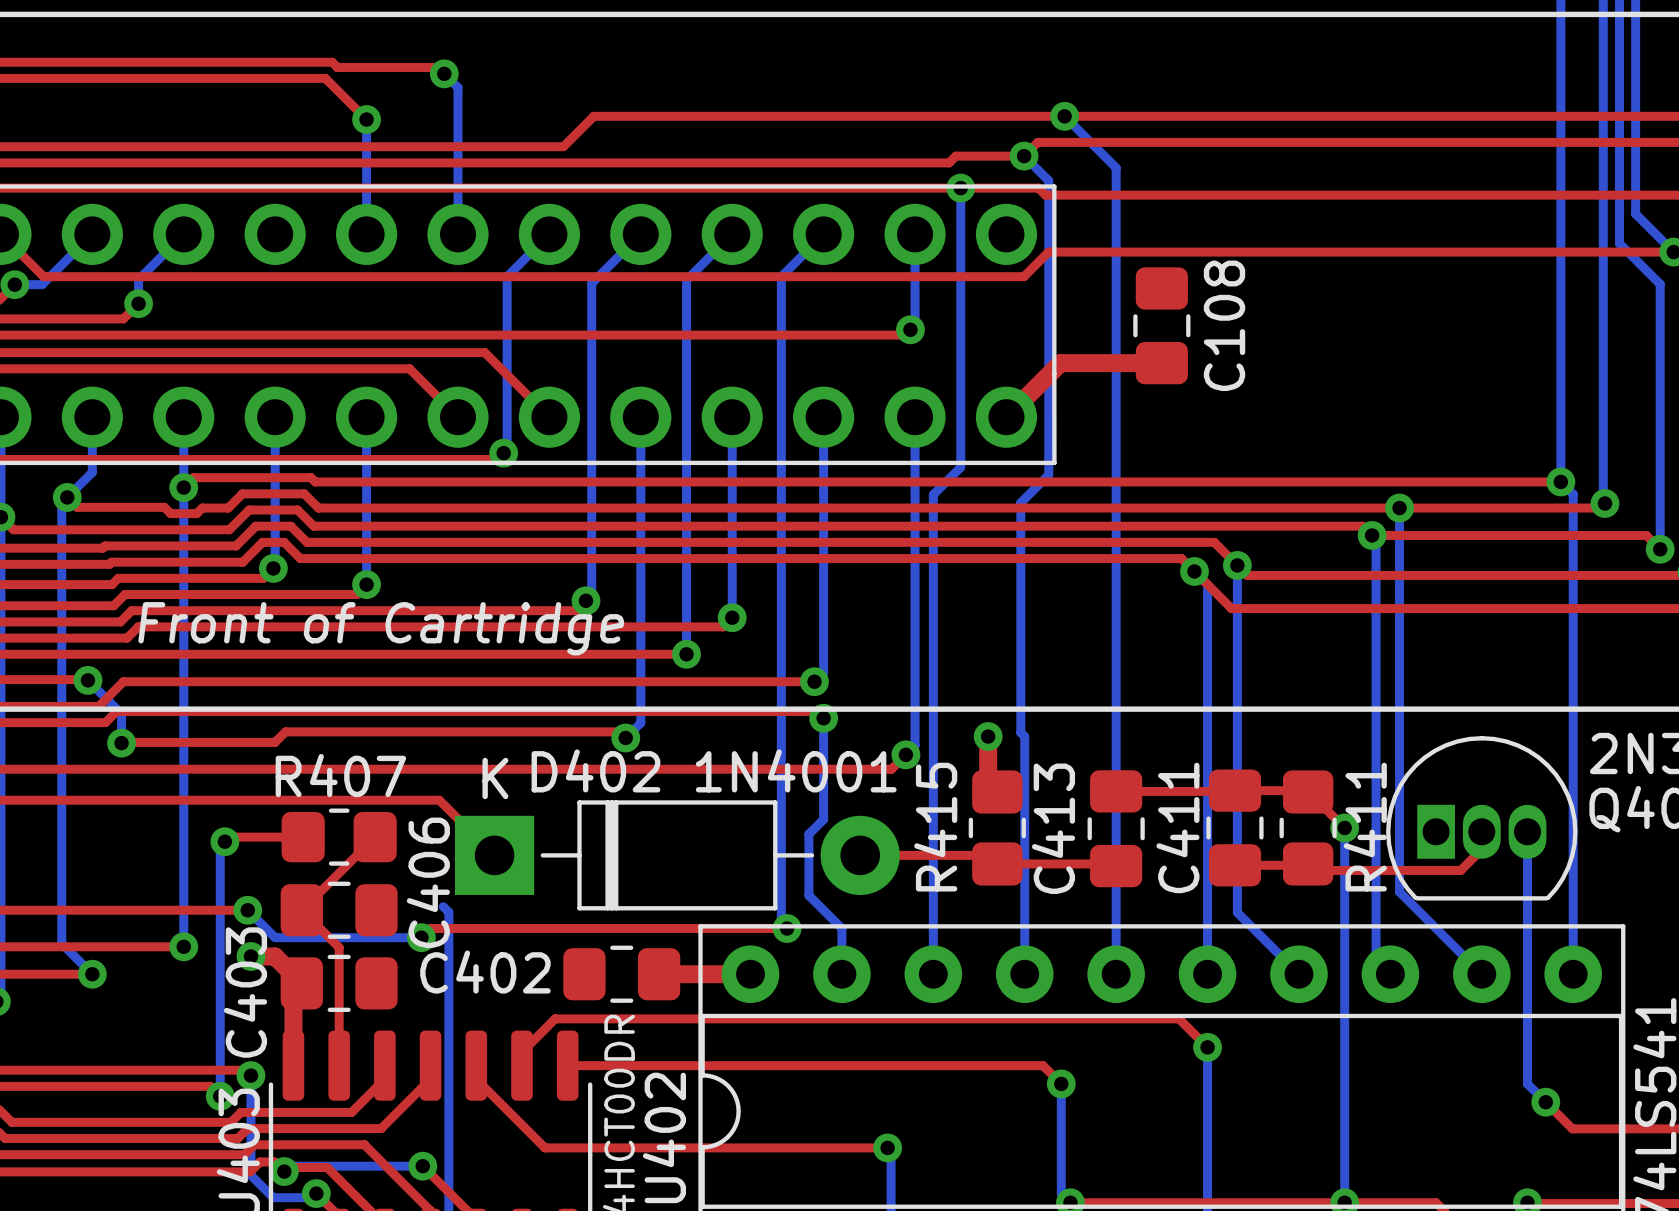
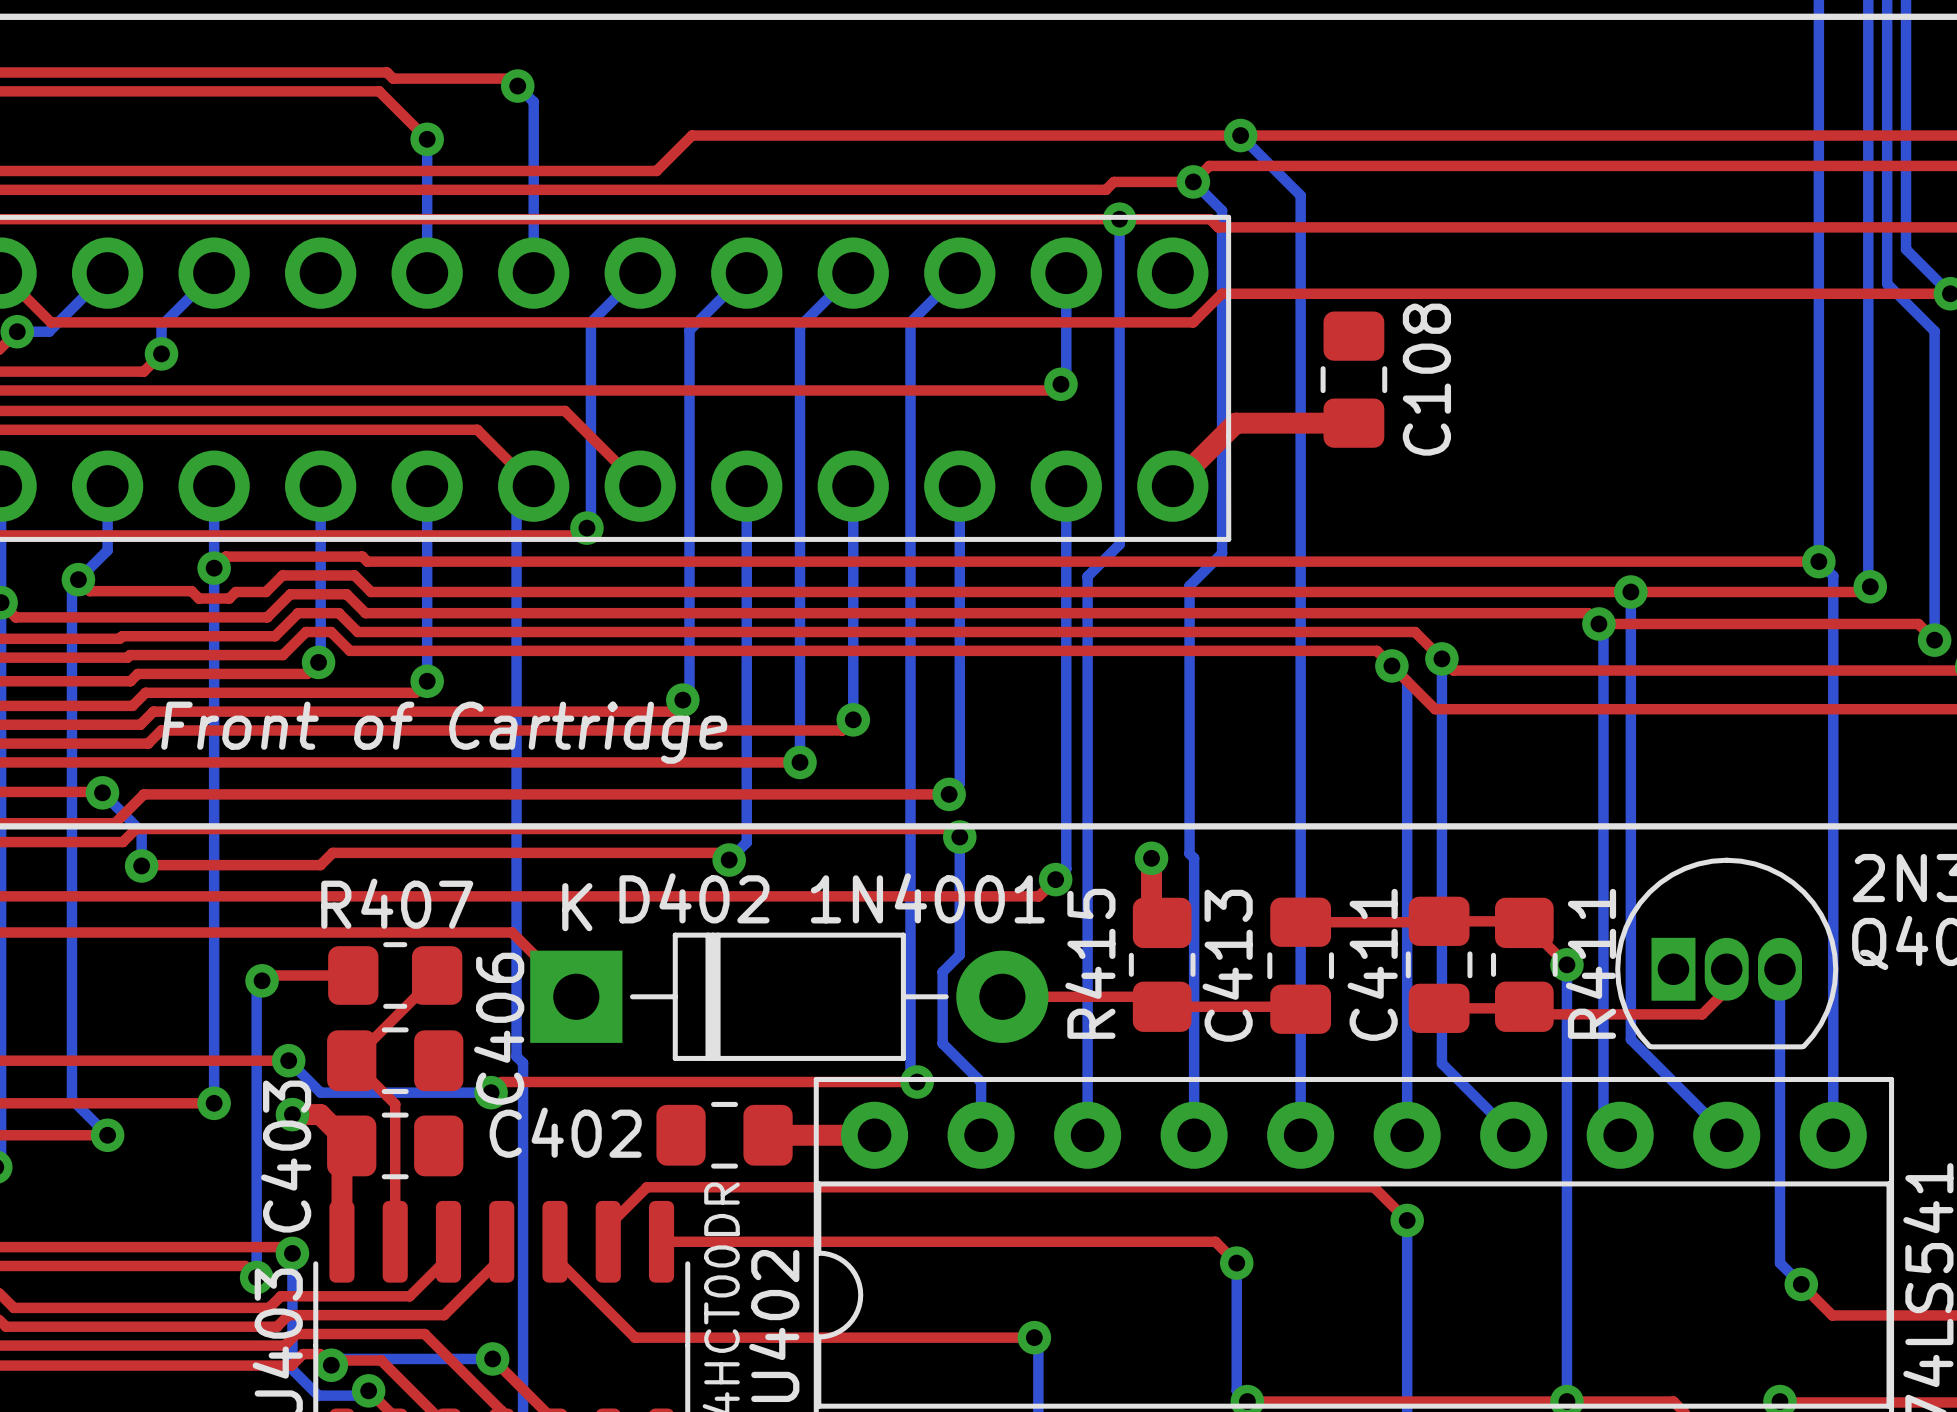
bottom track: none -> (516, 503) (516, 1056)

